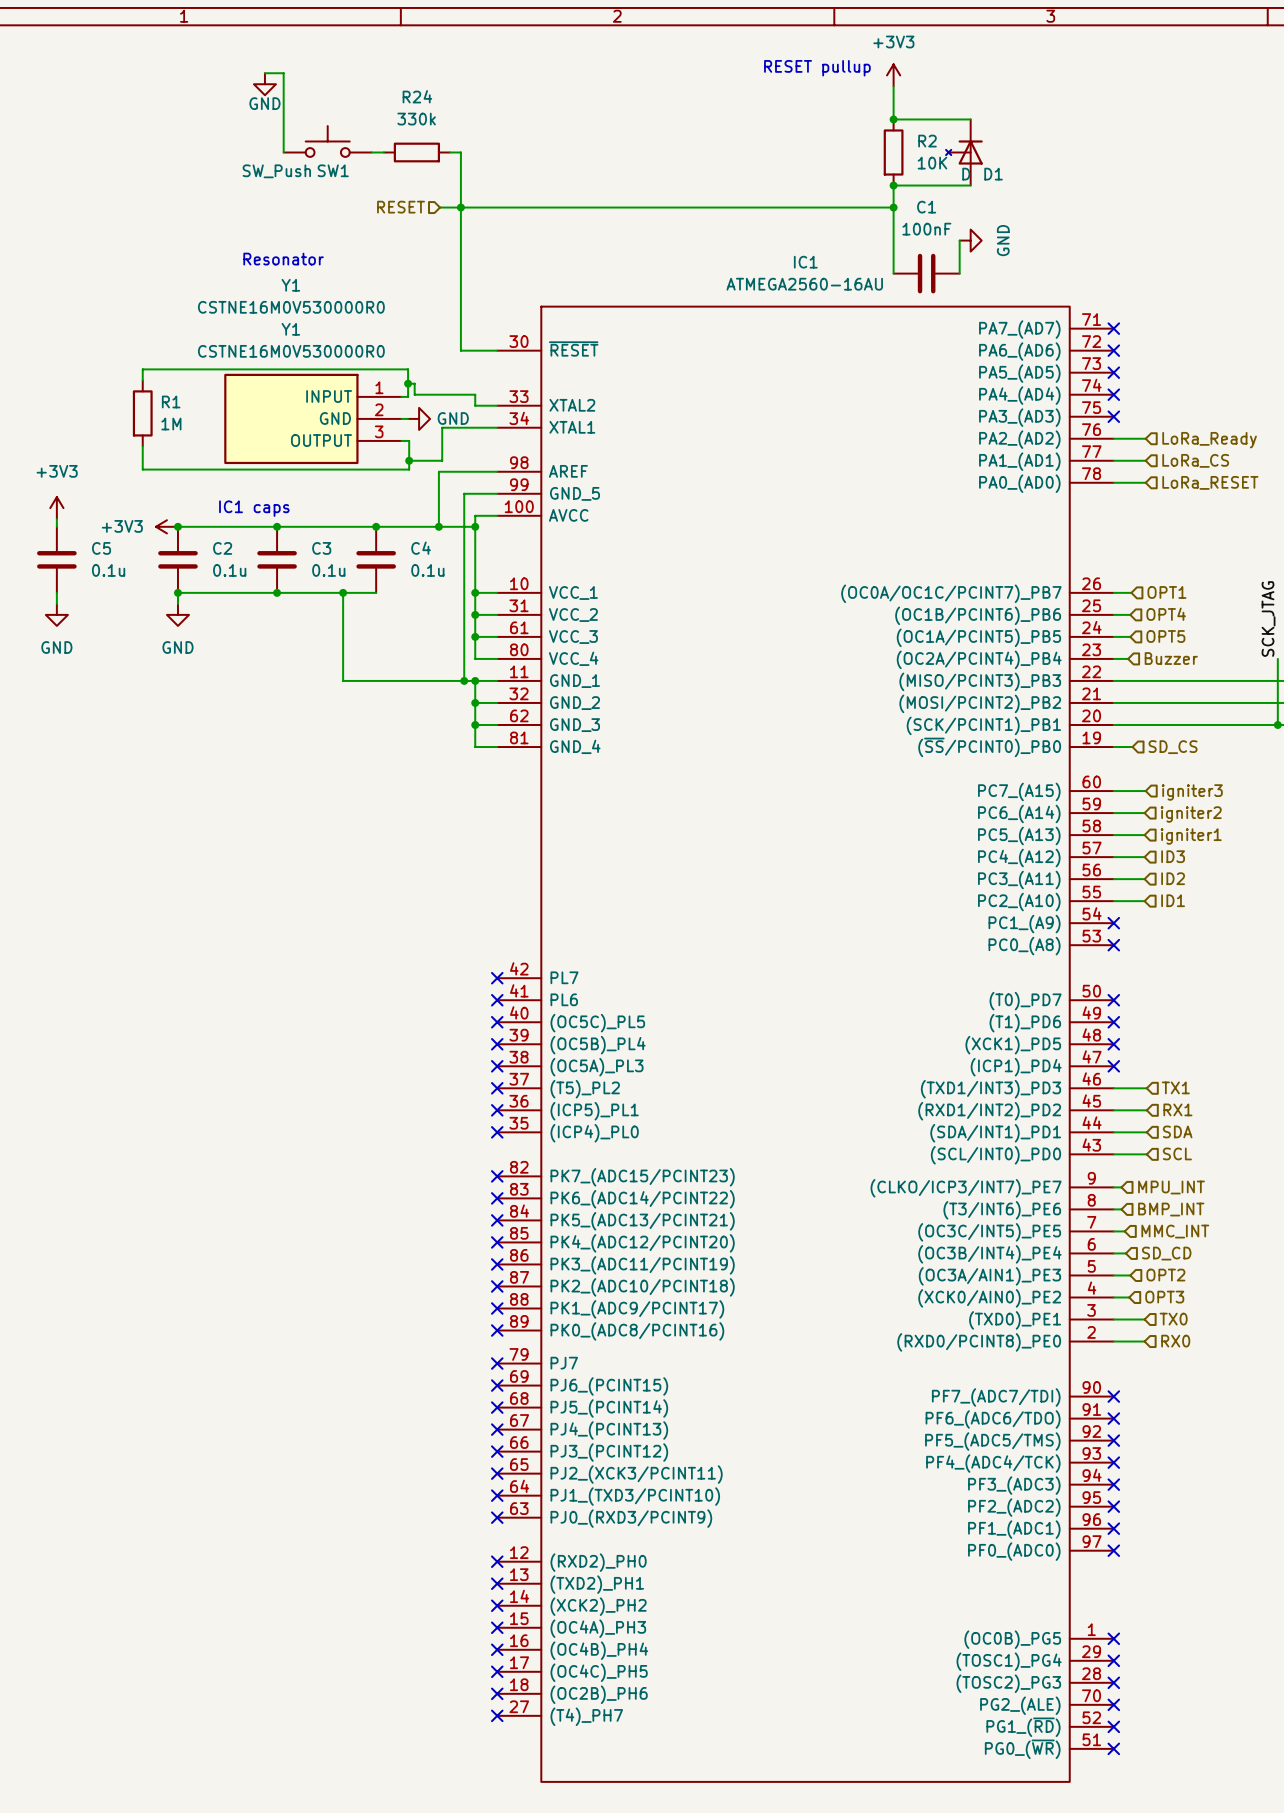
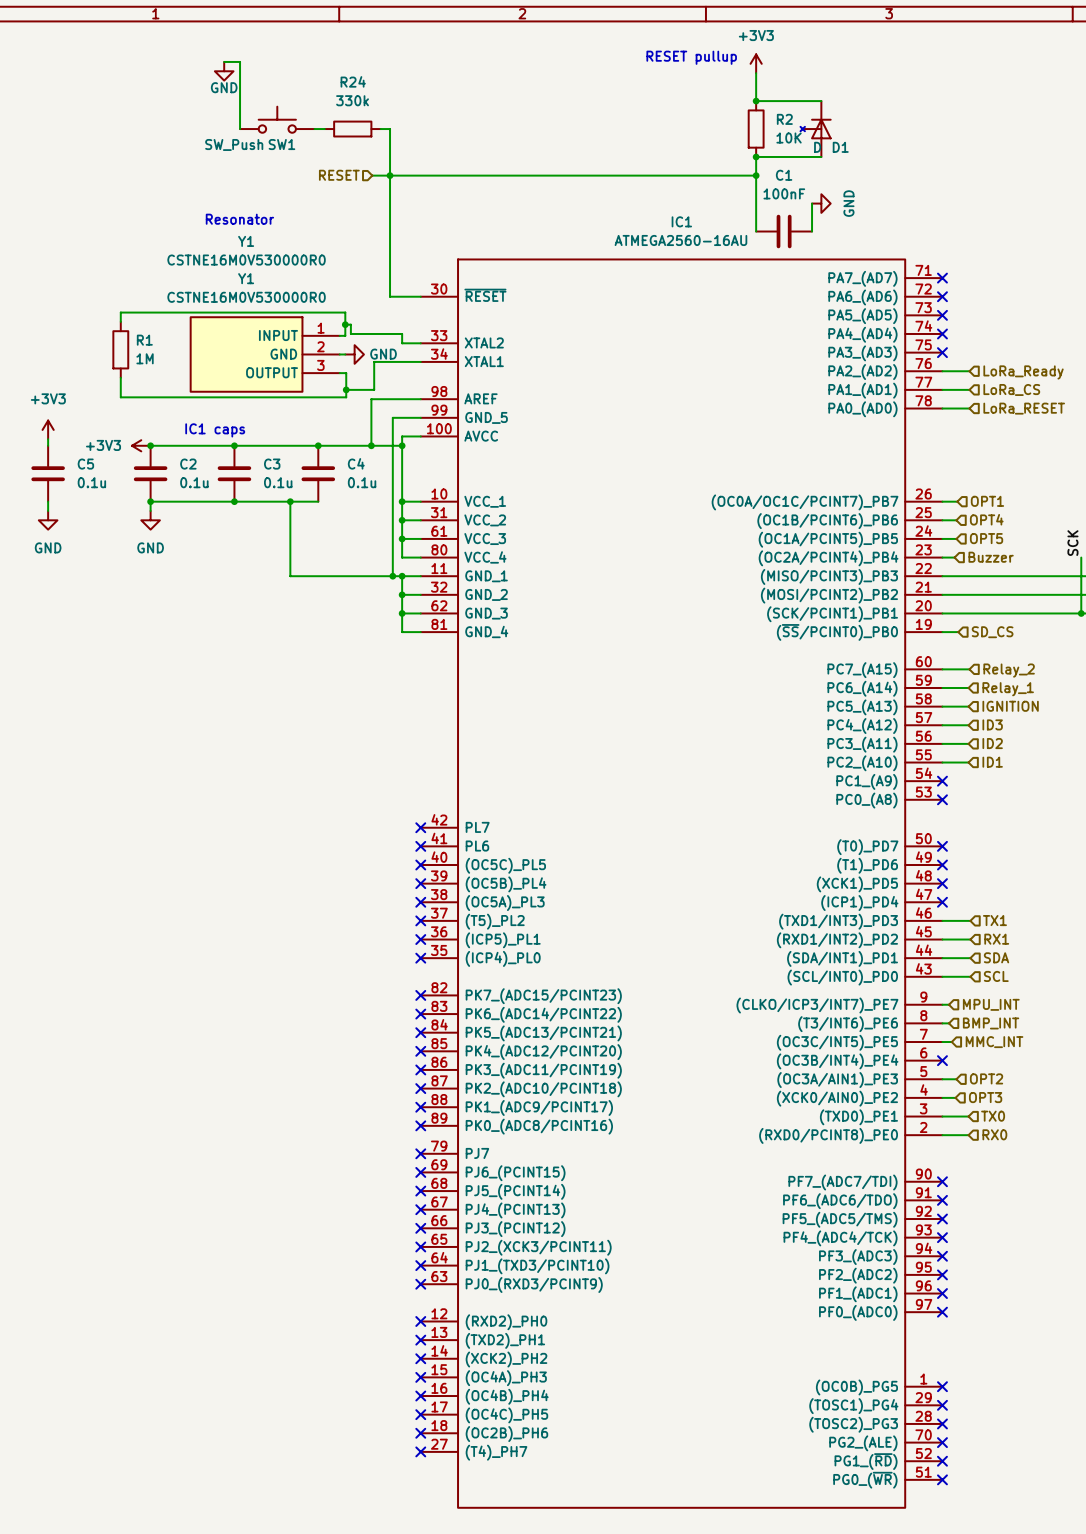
label: SCK_JTAG (1268, 619) -> SCK (1072, 543)
hierarchical label: igniter3 (1192, 792) -> Relay_2 (1009, 670)
hierarchical label: igniter2 (1191, 814) -> Relay_1 (1008, 689)
hierarchical label: igniter1 (1191, 836) -> IGNITION (1010, 706)
wire: (1113, 1253) (1125, 1253) -> none
no-connect mark: none -> (942, 1060)
hierarchical label: SD_CD (1166, 1253) -> none

